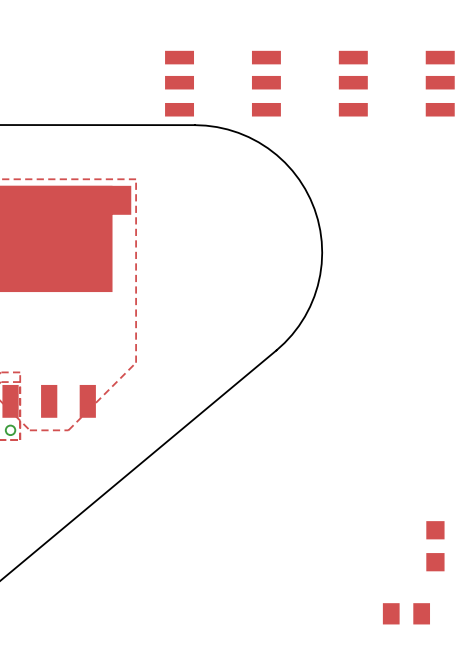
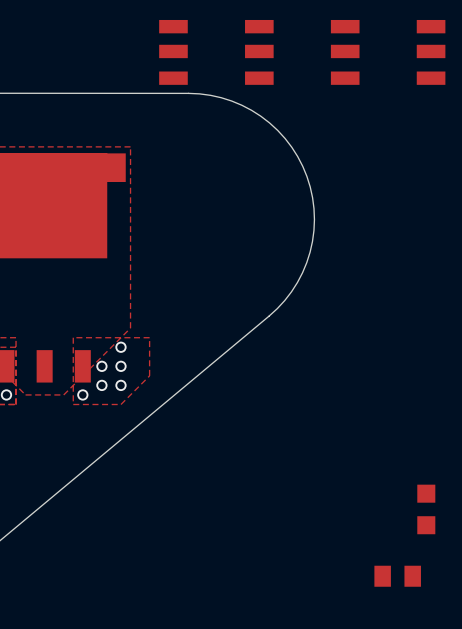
top zone outline: none -> (149, 337) (73, 337) (73, 404) (120, 404) (149, 375) (149, 337)
via: none -> (120, 347)
via: none -> (101, 366)
via: none -> (120, 366)
via: none -> (101, 385)
via: none -> (120, 385)
via: none -> (82, 394)

